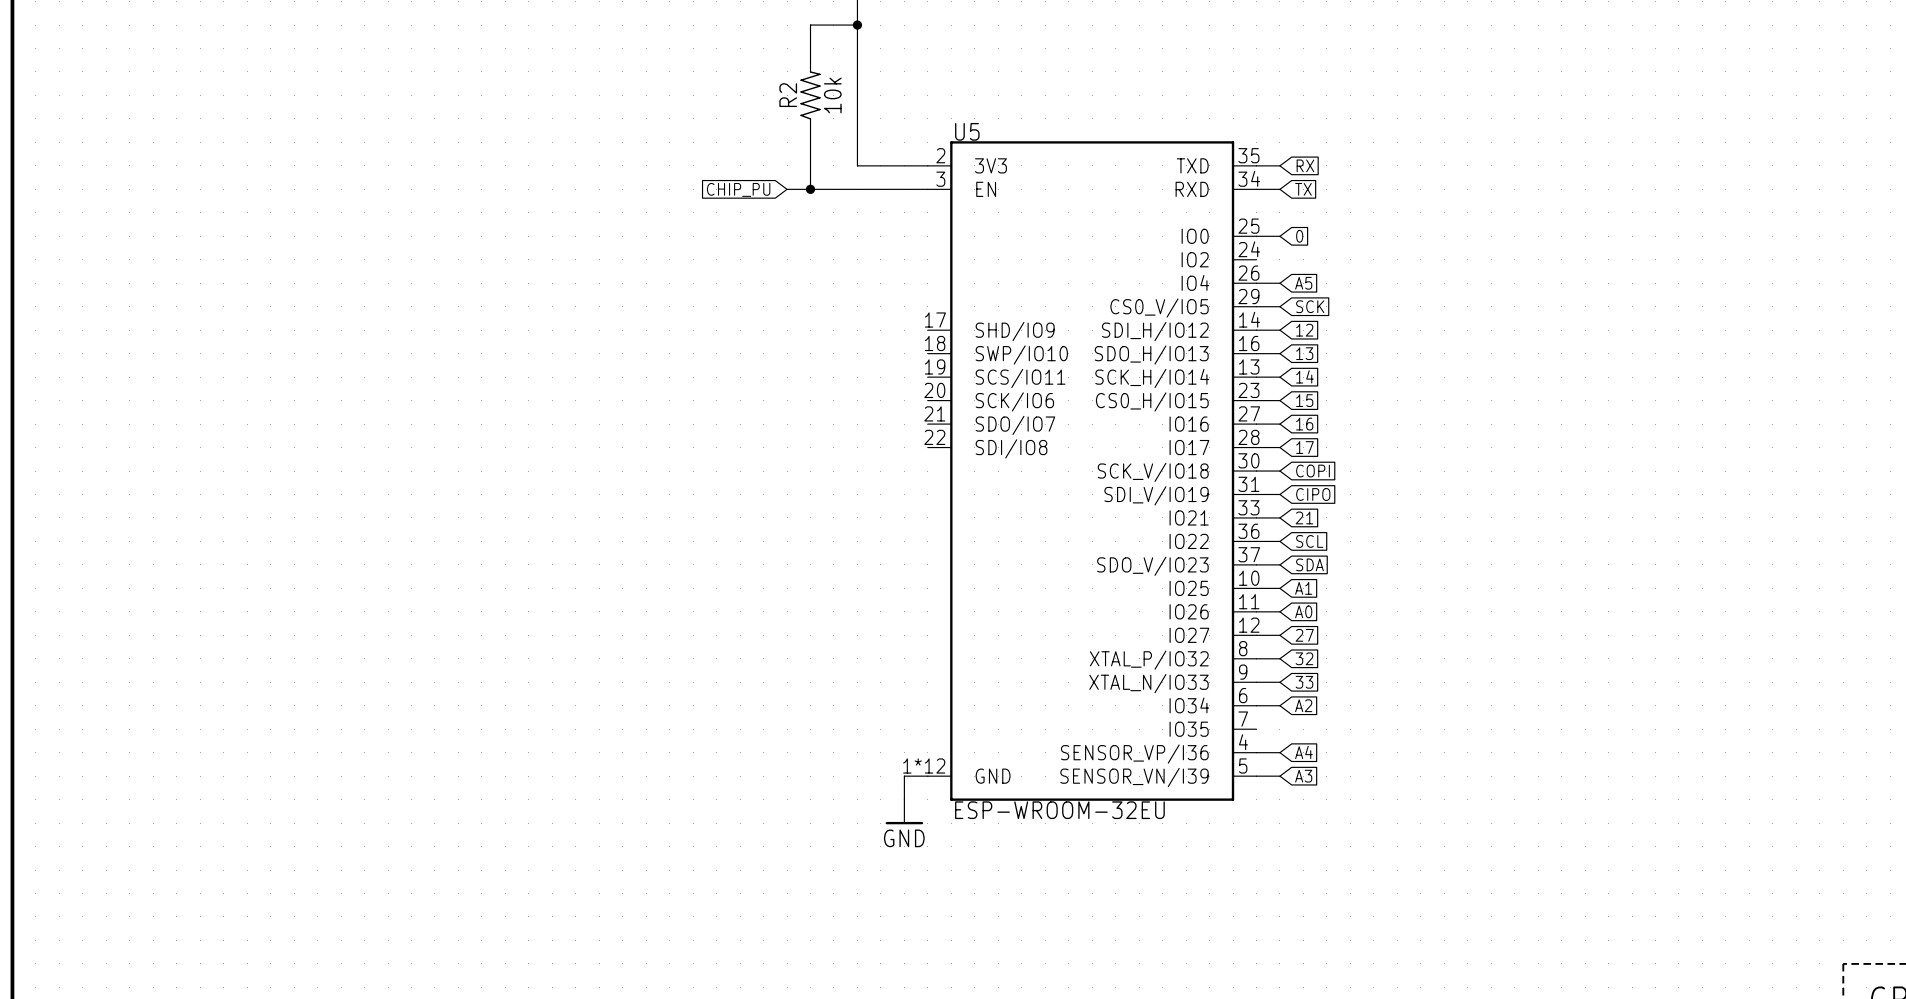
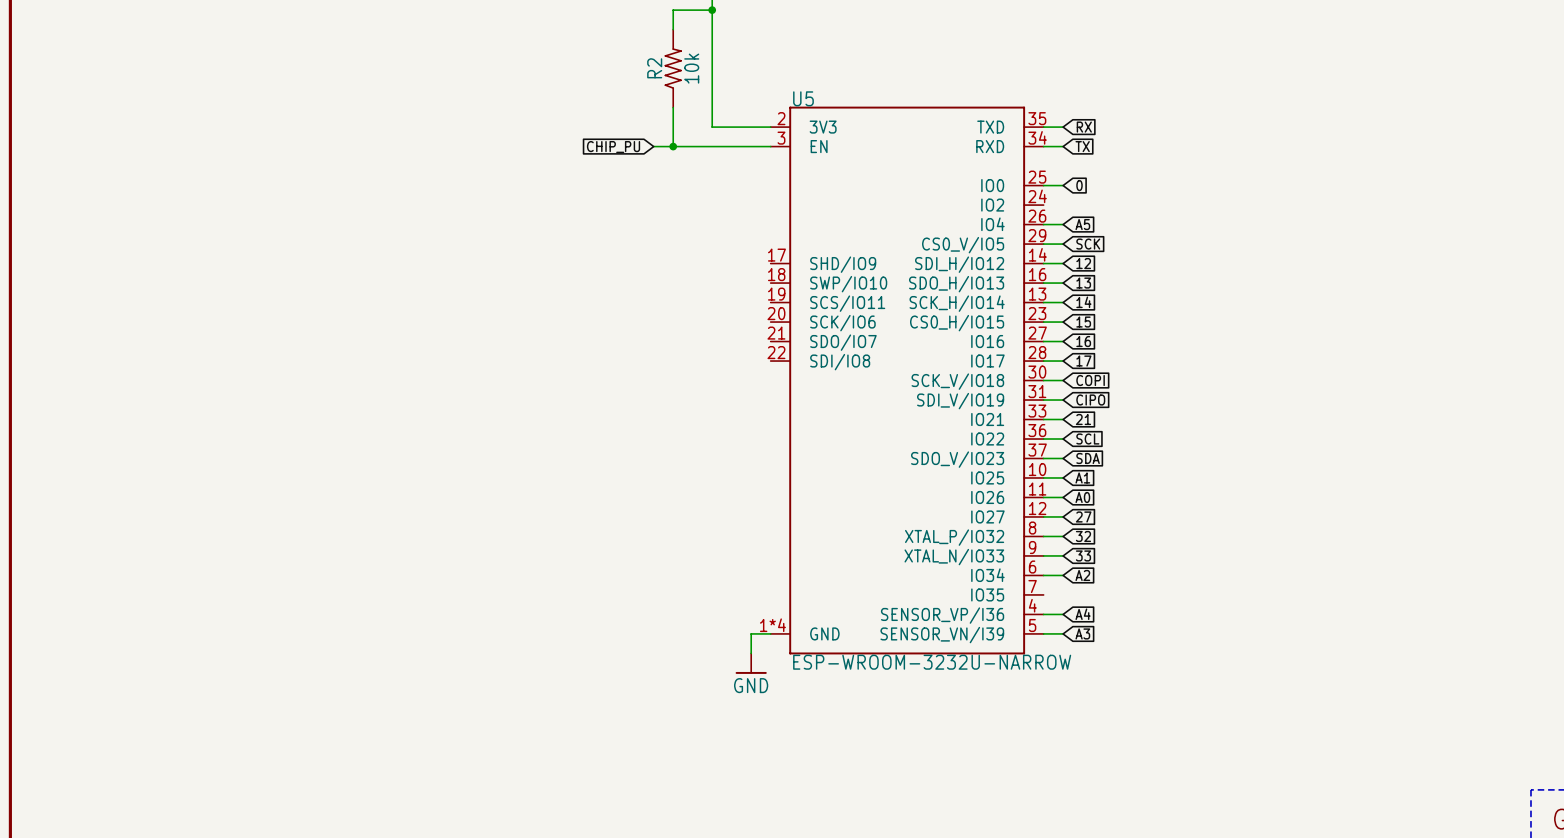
U5 pin number: 1*12 (924, 765) -> 1*4 (772, 625)
U5 value: ESP-WROOM-32EU (1059, 810) -> ESP-WROOM-3232U-NARROW (932, 662)

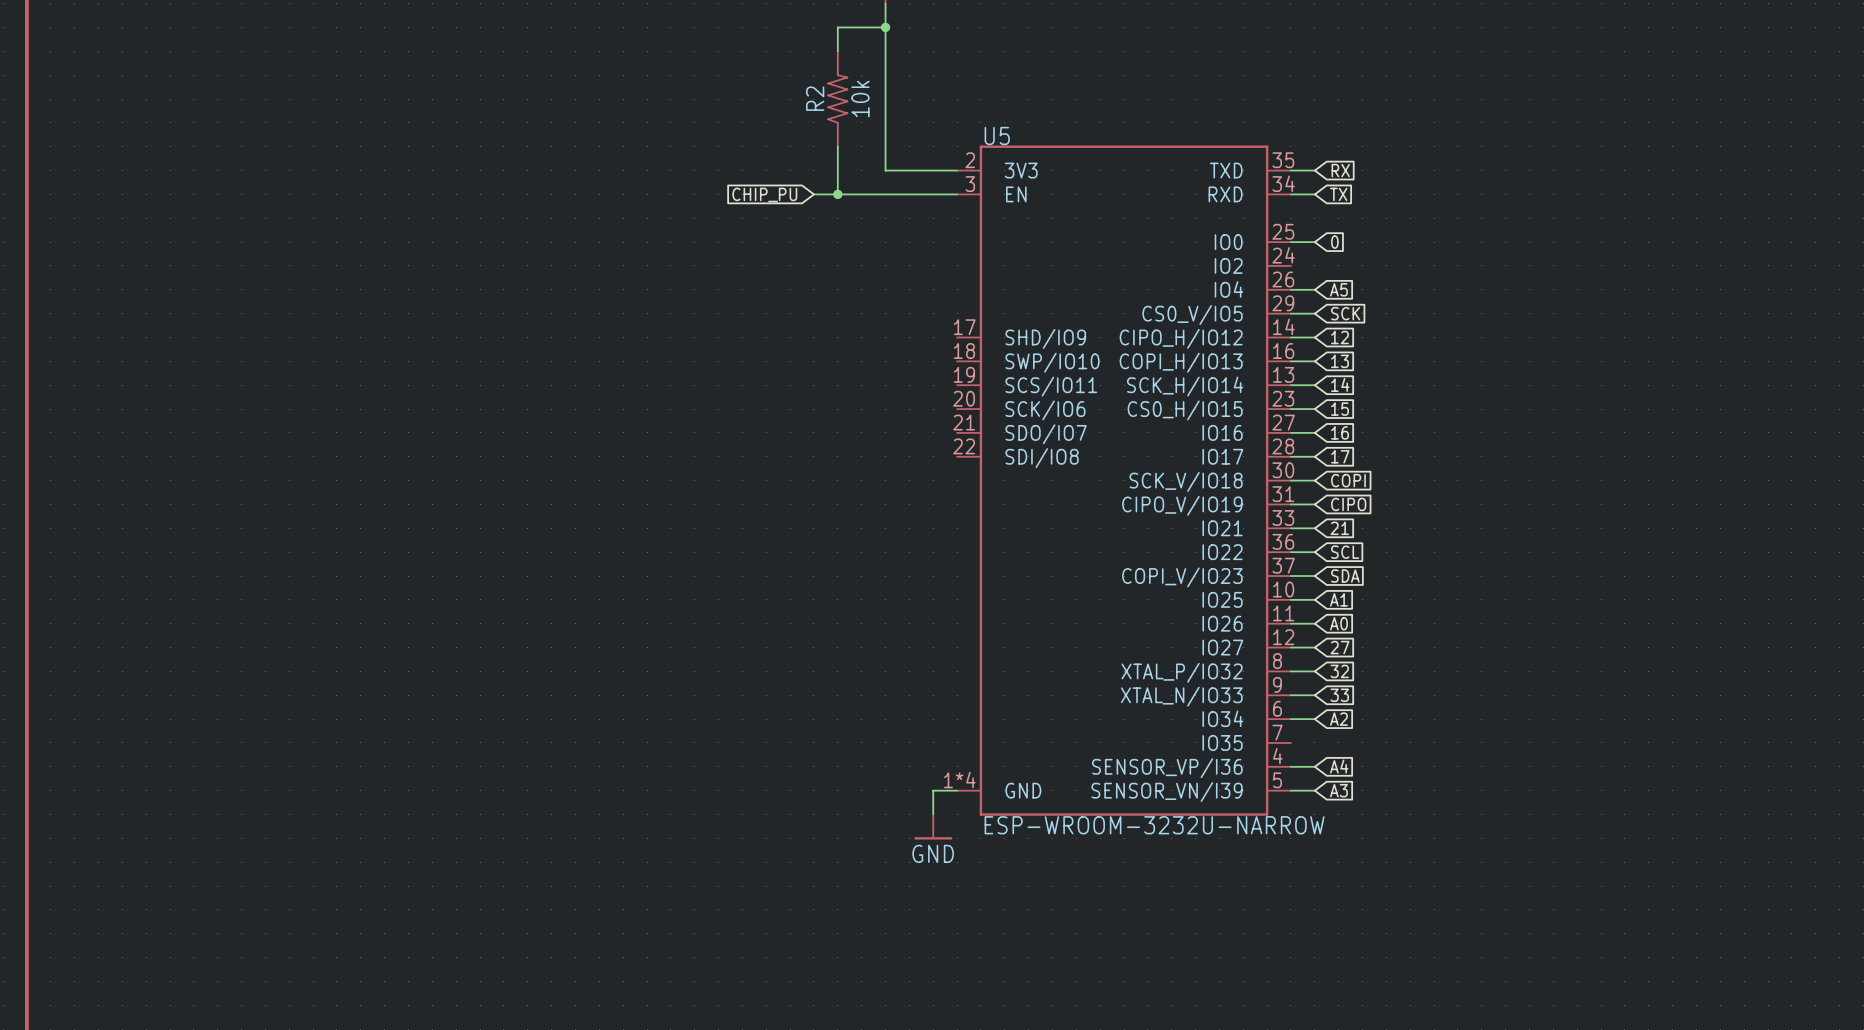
U5 pin name: SDI_H/IO12 (959, 264) -> CIPO_H/IO12 (1181, 338)
U5 pin name: SDO_H/IO13 (956, 284) -> COPI_H/IO13 (1181, 362)
U5 pin name: SDI_V/IO19 (960, 401) -> CIPO_V/IO19 (1182, 505)
U5 pin name: SDO_V/IO23 (957, 459) -> COPI_V/IO23 (1182, 577)

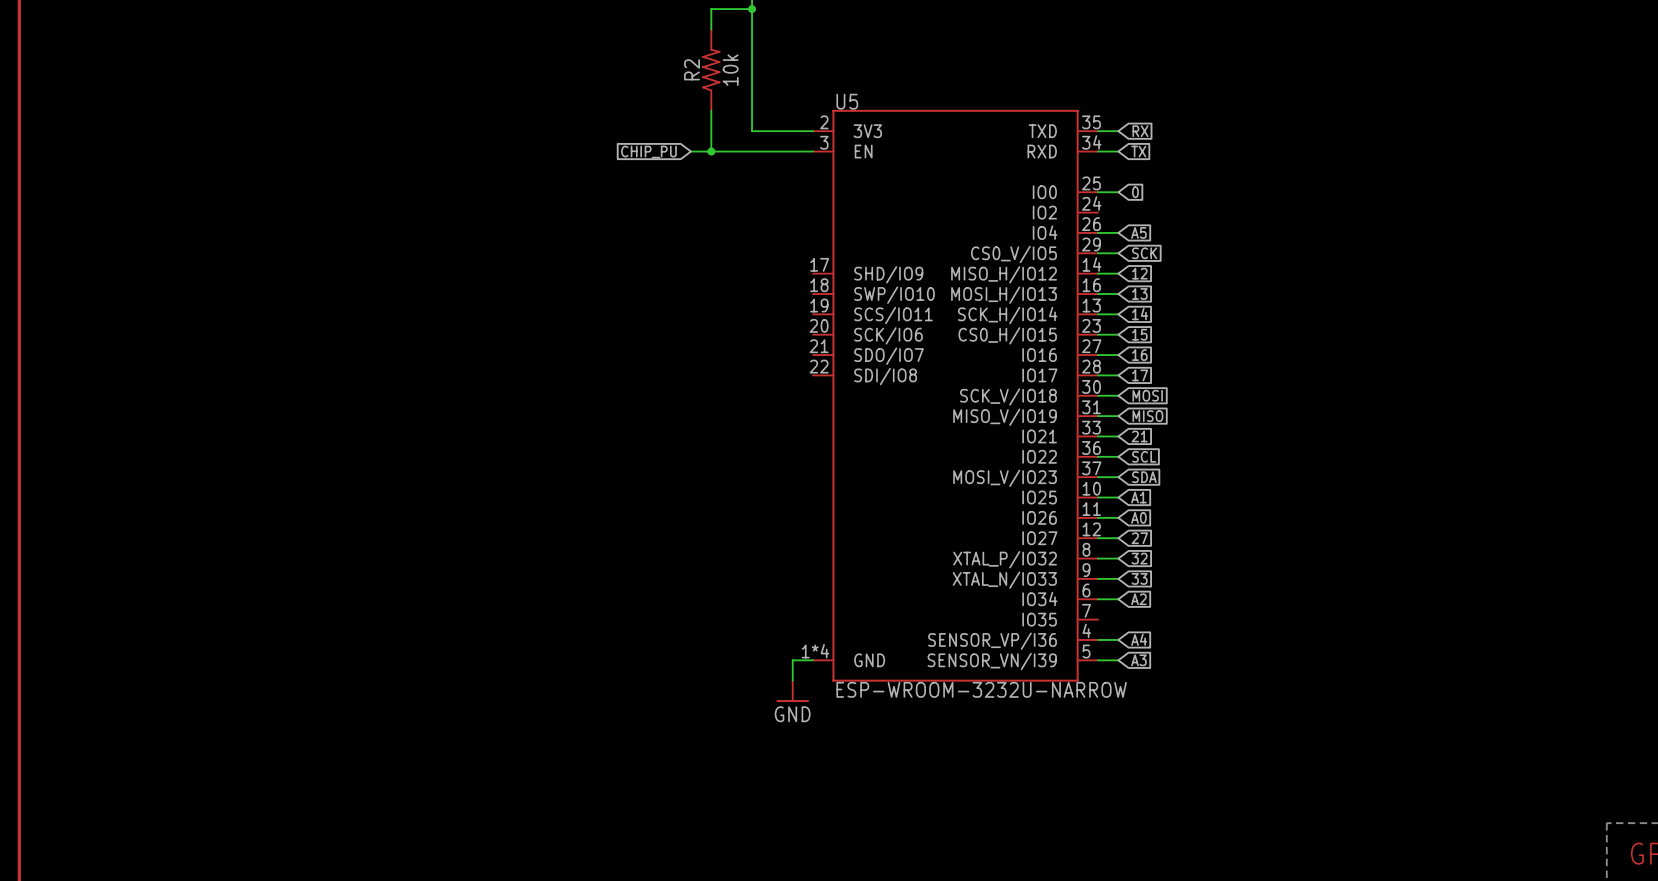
U5 pin name: CIPO_H/IO12 (1181, 338) -> MISO_H/IO12 (1004, 274)
U5 pin name: COPI_H/IO13 (1181, 362) -> MOSI_H/IO13 (1004, 295)
global label: COPI (1348, 480) -> MOSI (1147, 395)
global label: CIPO (1348, 504) -> MISO (1147, 416)
U5 pin name: CIPO_V/IO19 (1182, 505) -> MISO_V/IO19 (1005, 417)
U5 pin name: COPI_V/IO23 (1182, 577) -> MOSI_V/IO23 (1005, 478)

